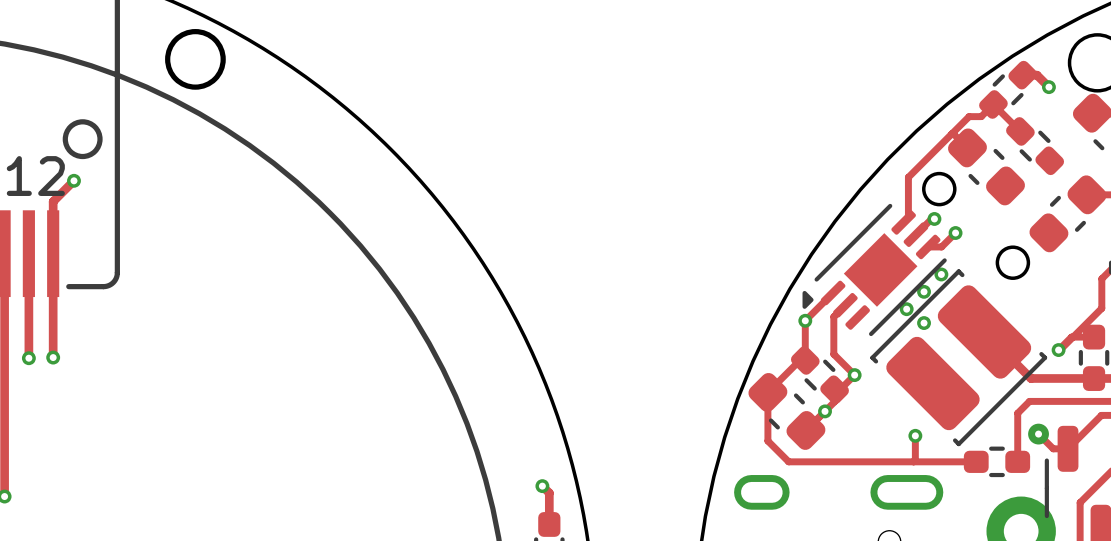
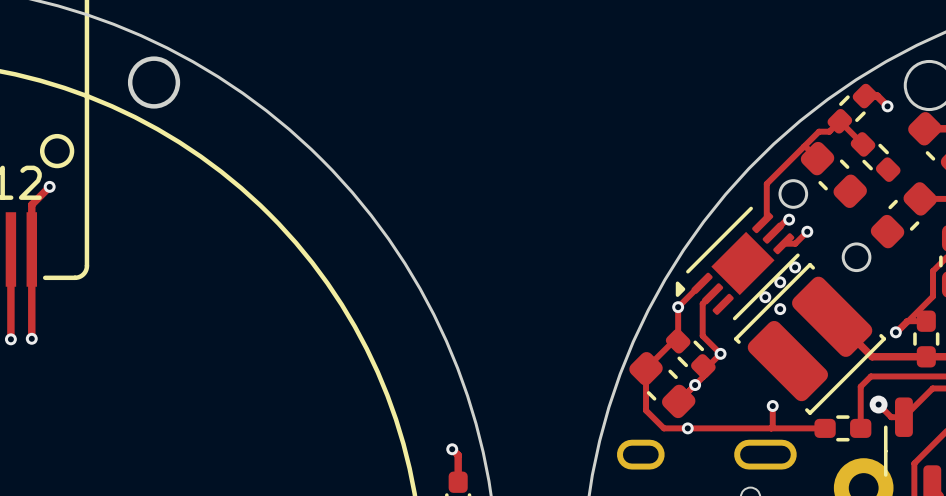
via: none -> (687, 428)

